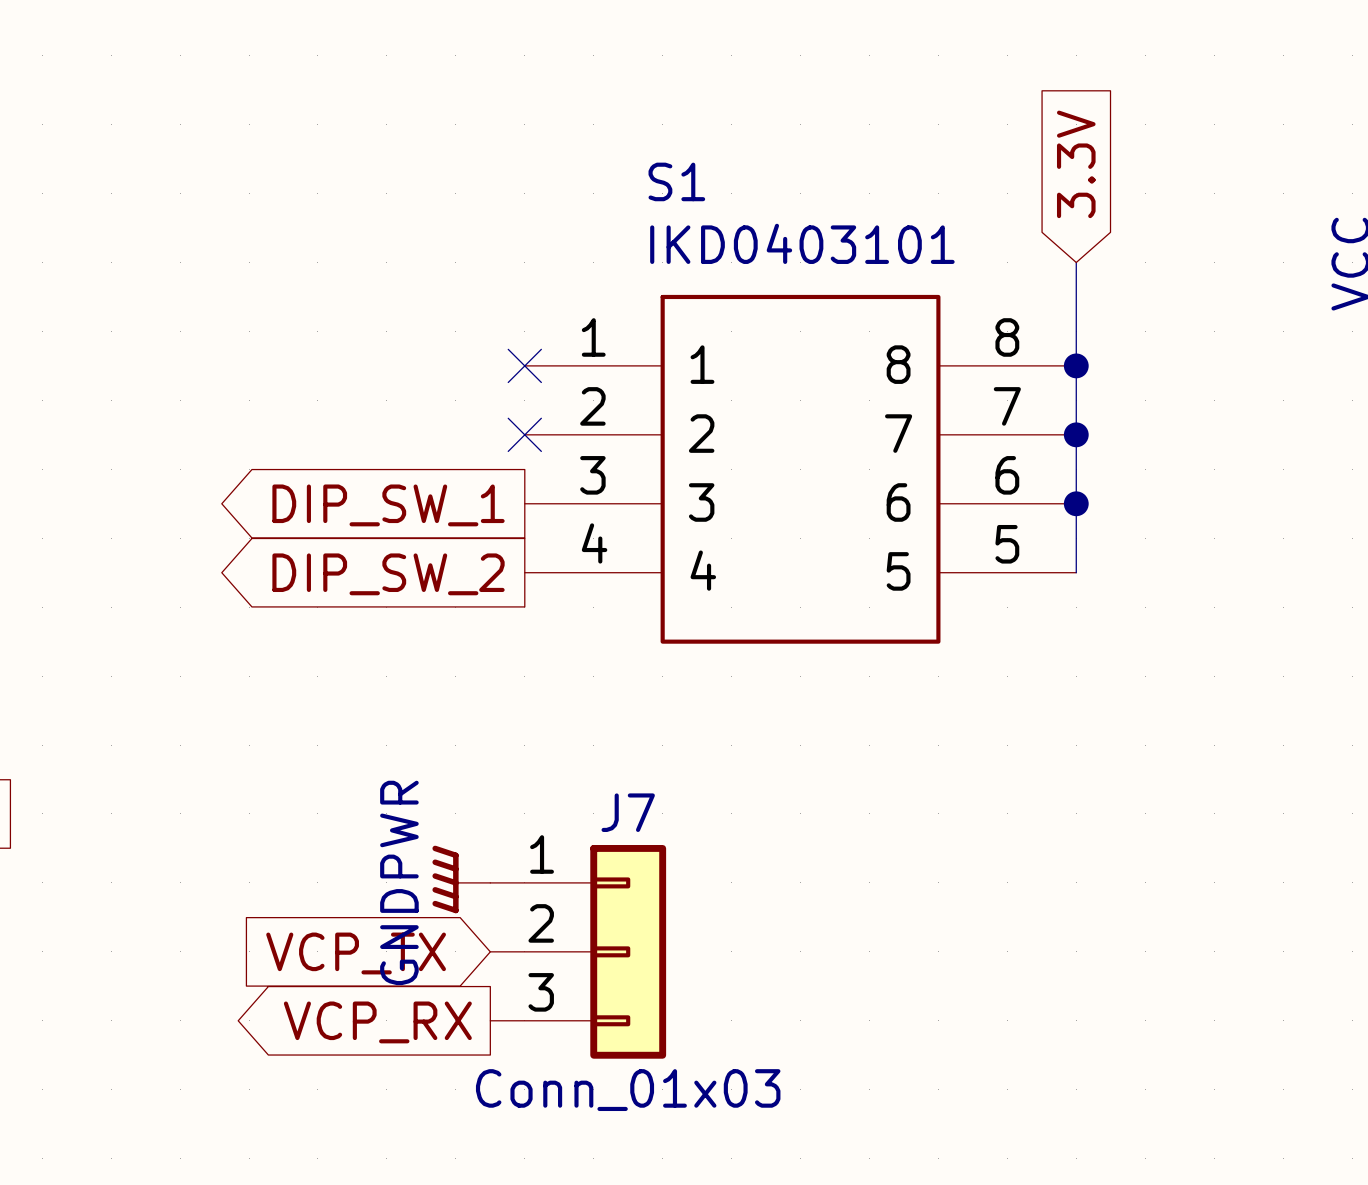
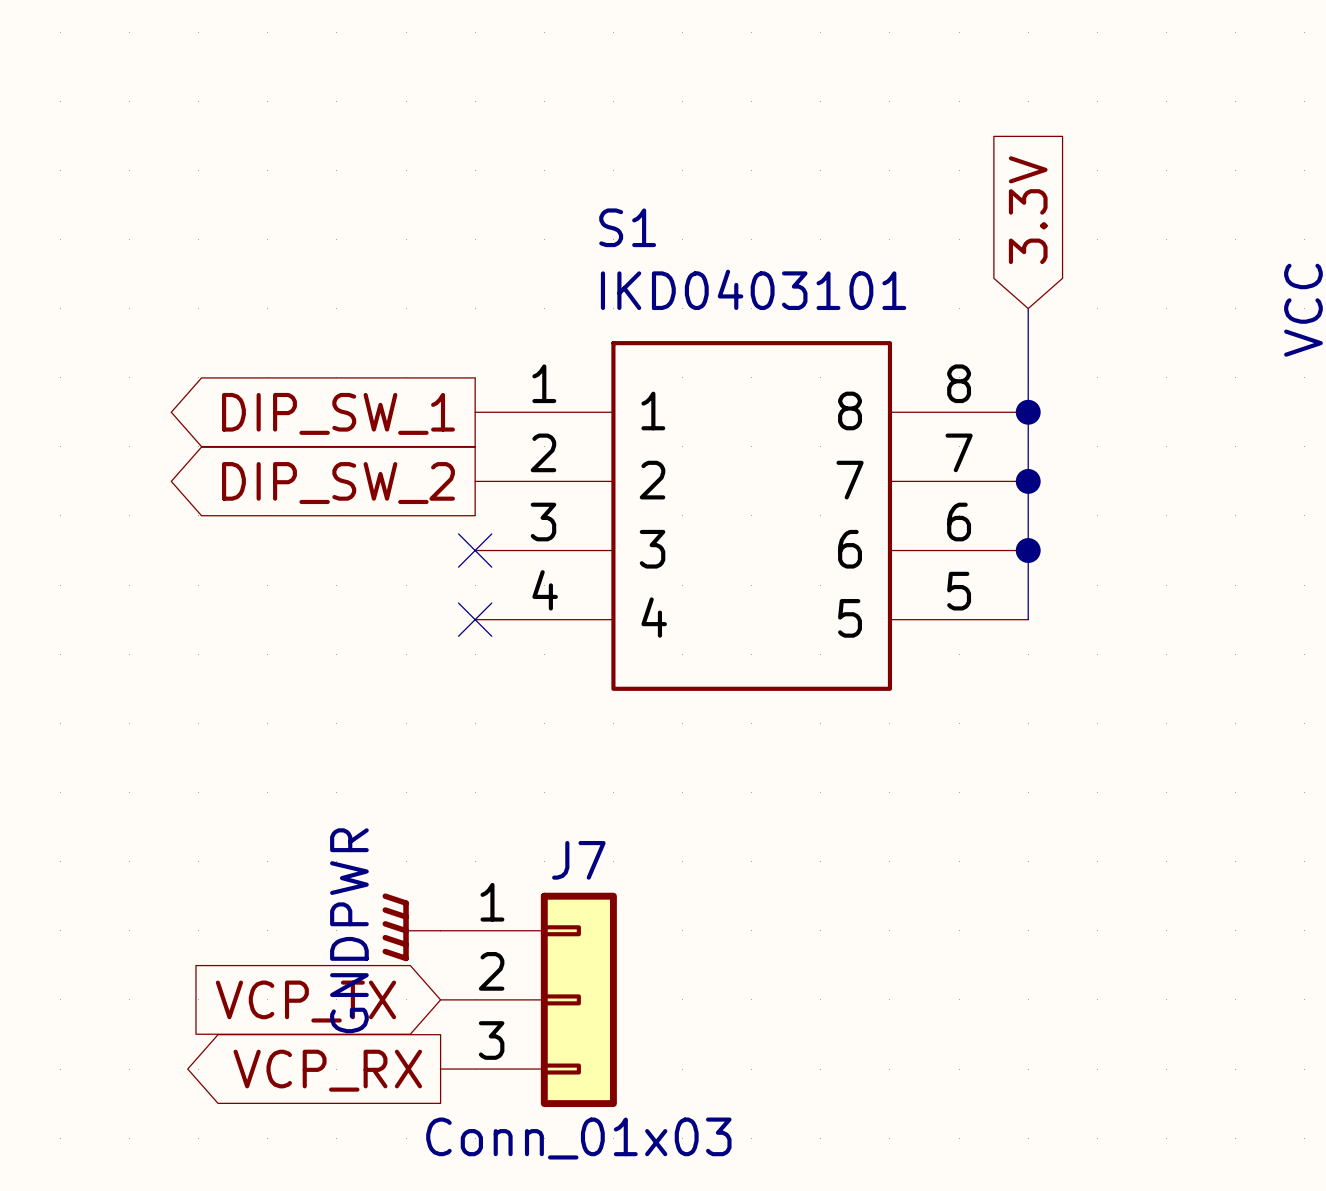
no-connect mark: (524, 365) -> none
no-connect mark: (524, 434) -> none
no-connect mark: none -> (475, 550)
global label position: DIP_SW_1 (388, 505) -> DIP_SW_1 (338, 413)
no-connect mark: none -> (475, 619)
global label position: DIP_SW_2 (388, 574) -> DIP_SW_2 (338, 483)

